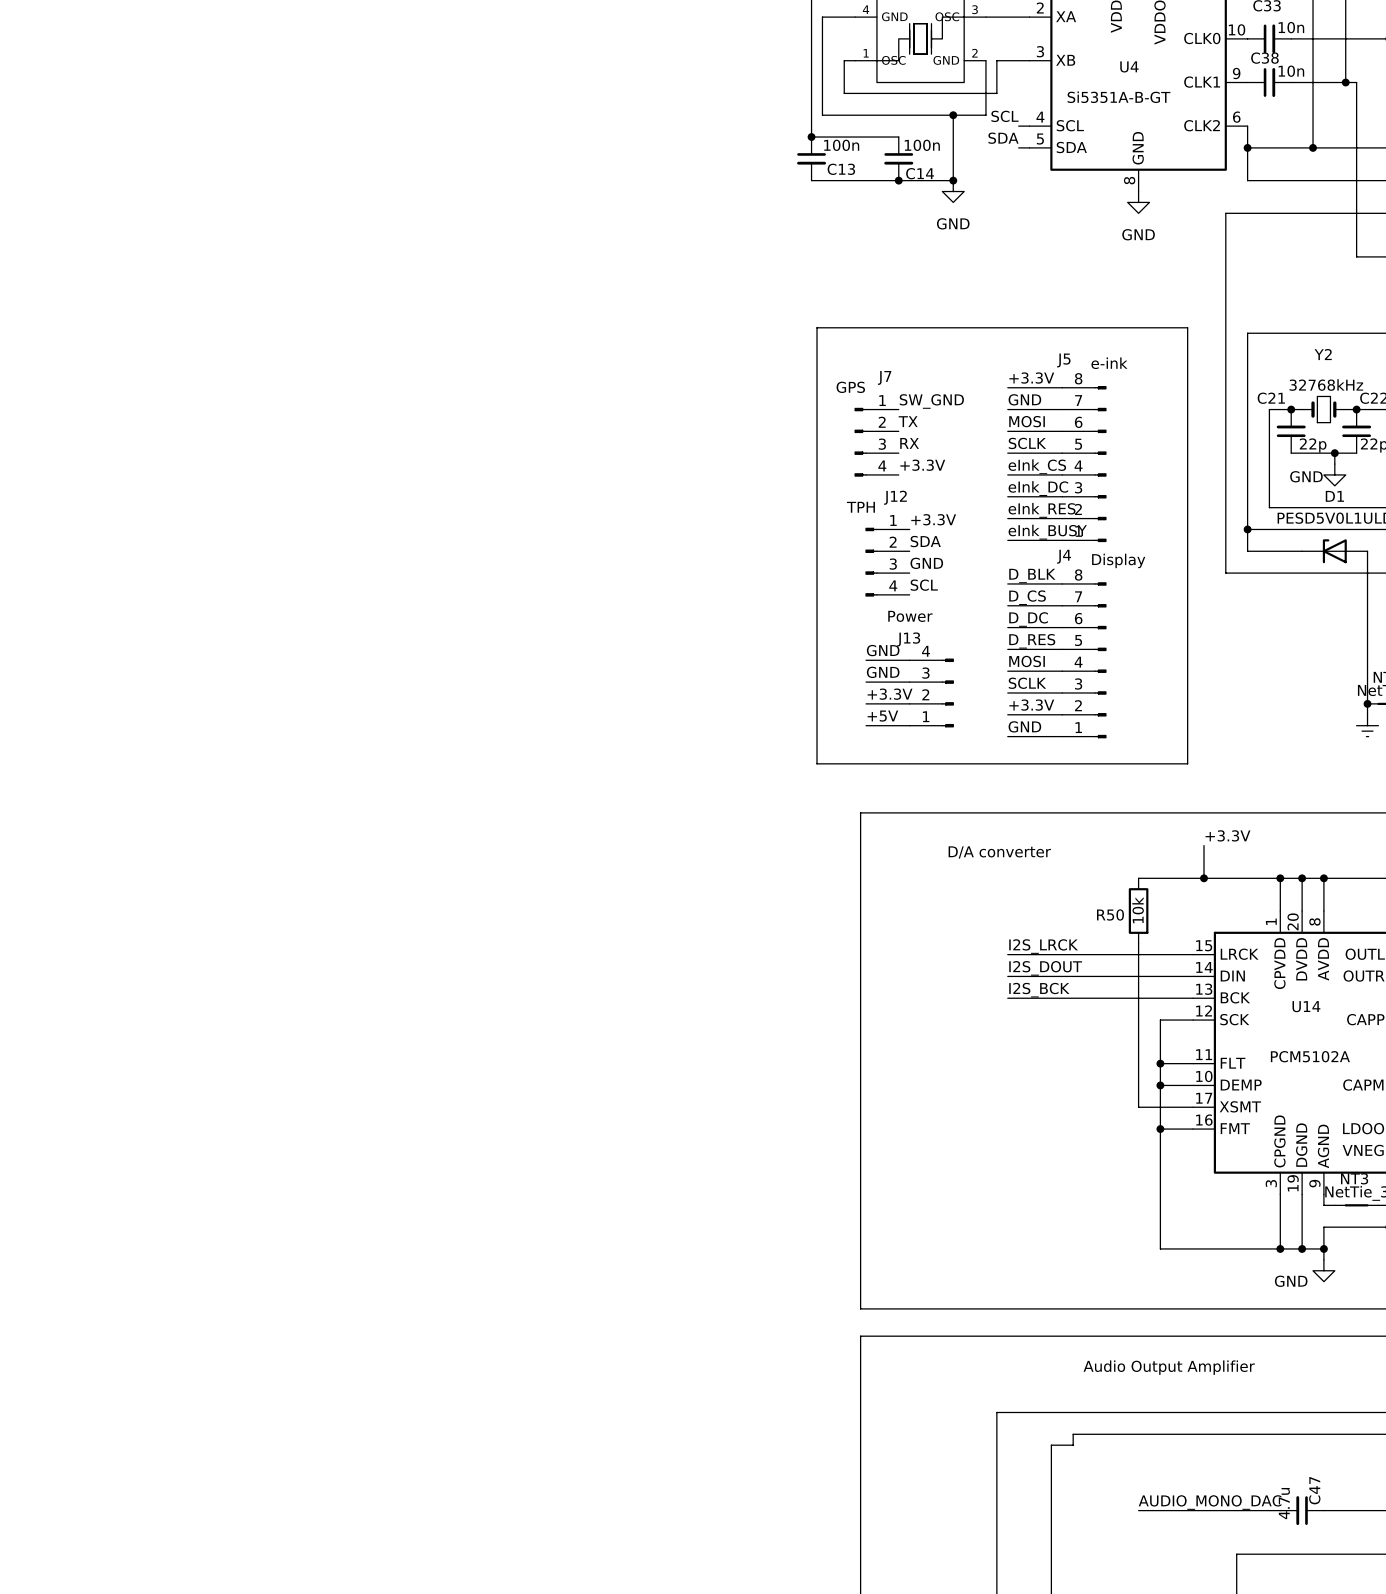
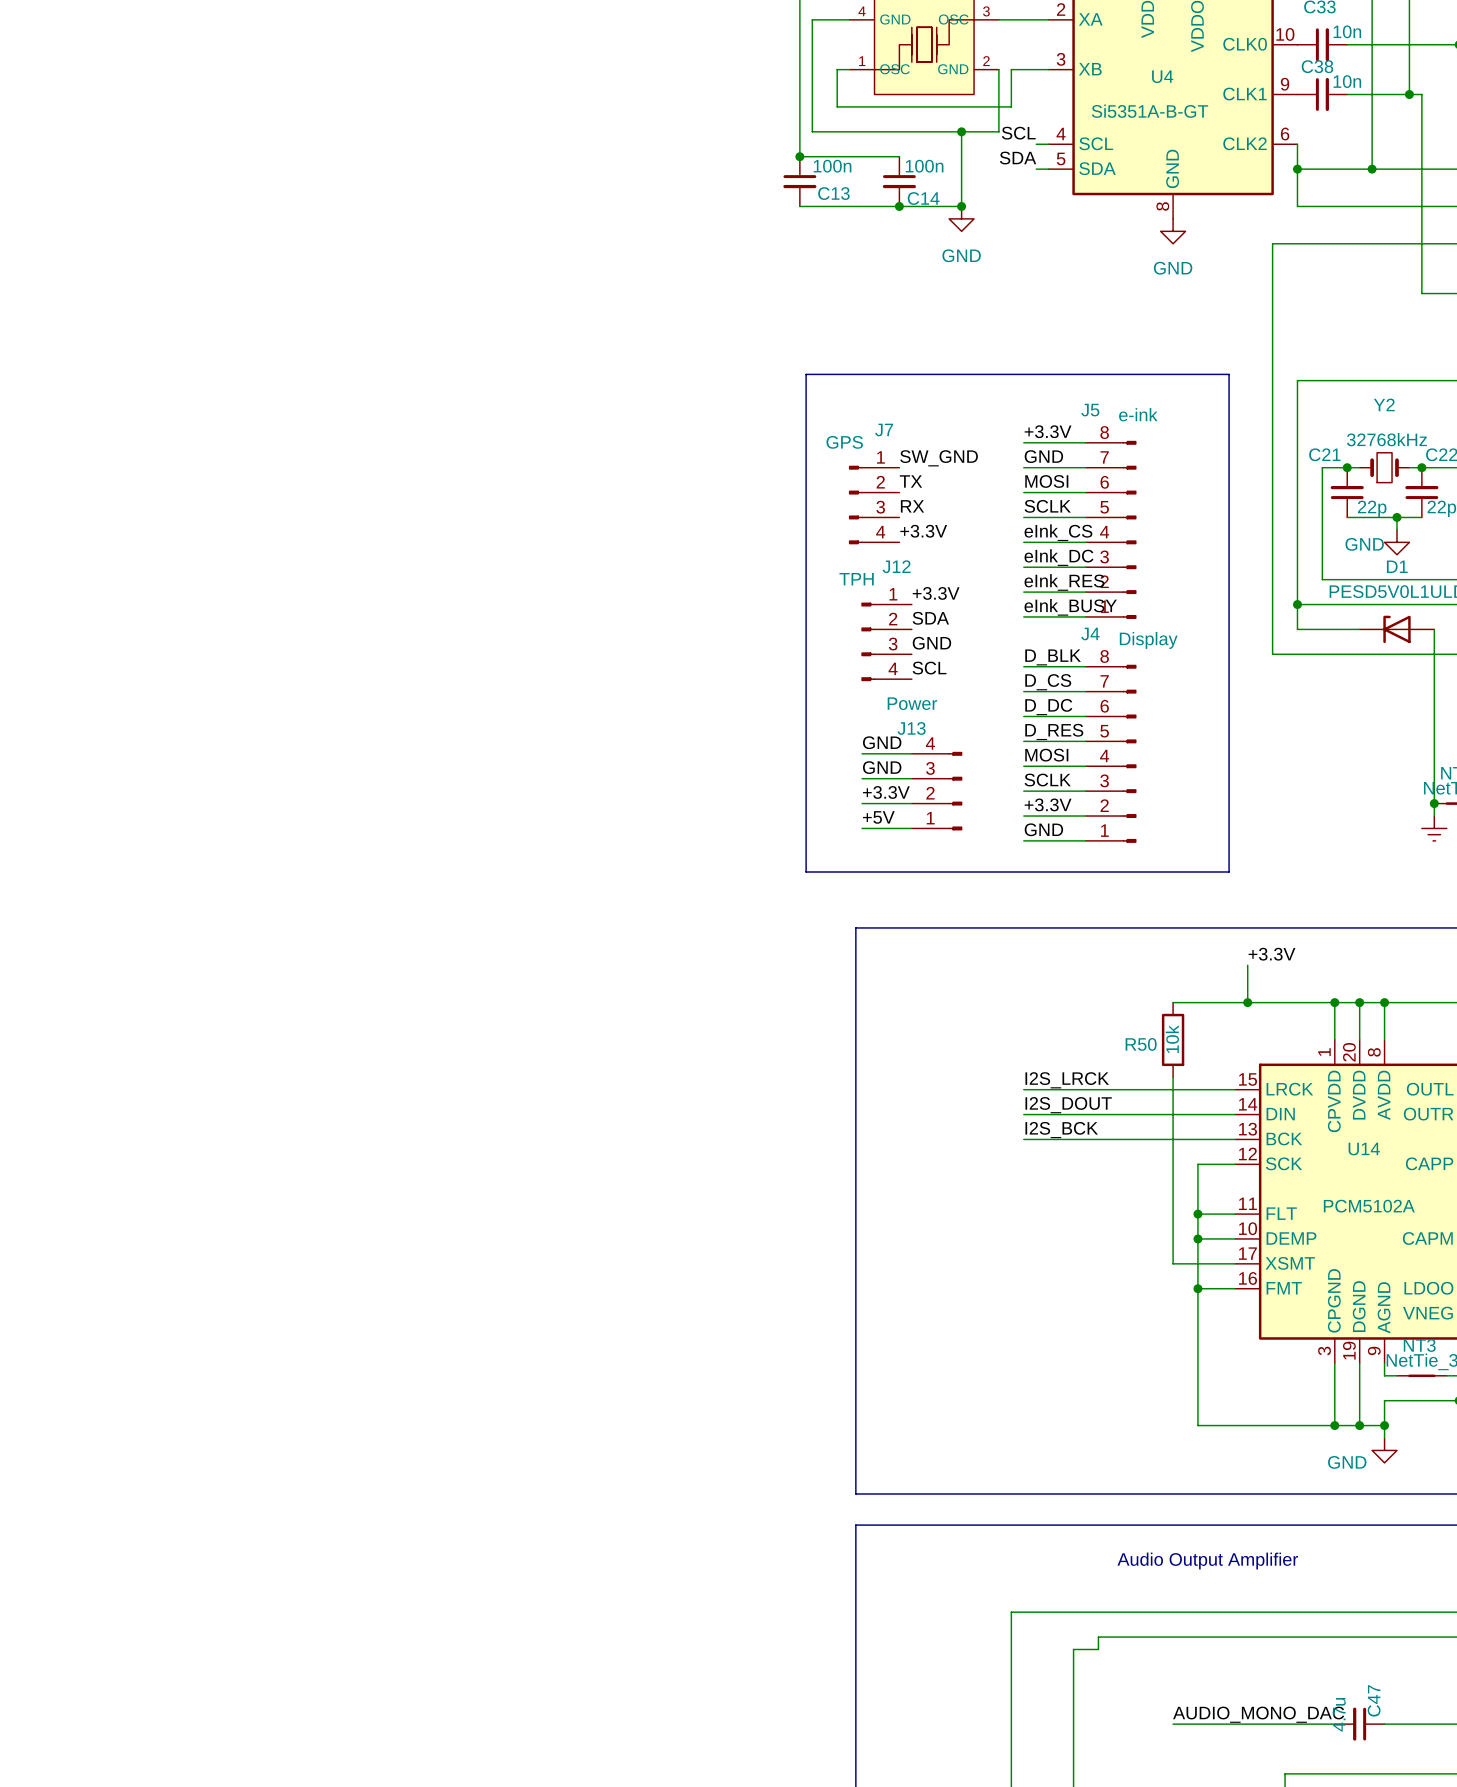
text: D/A converter (999, 852) -> none

